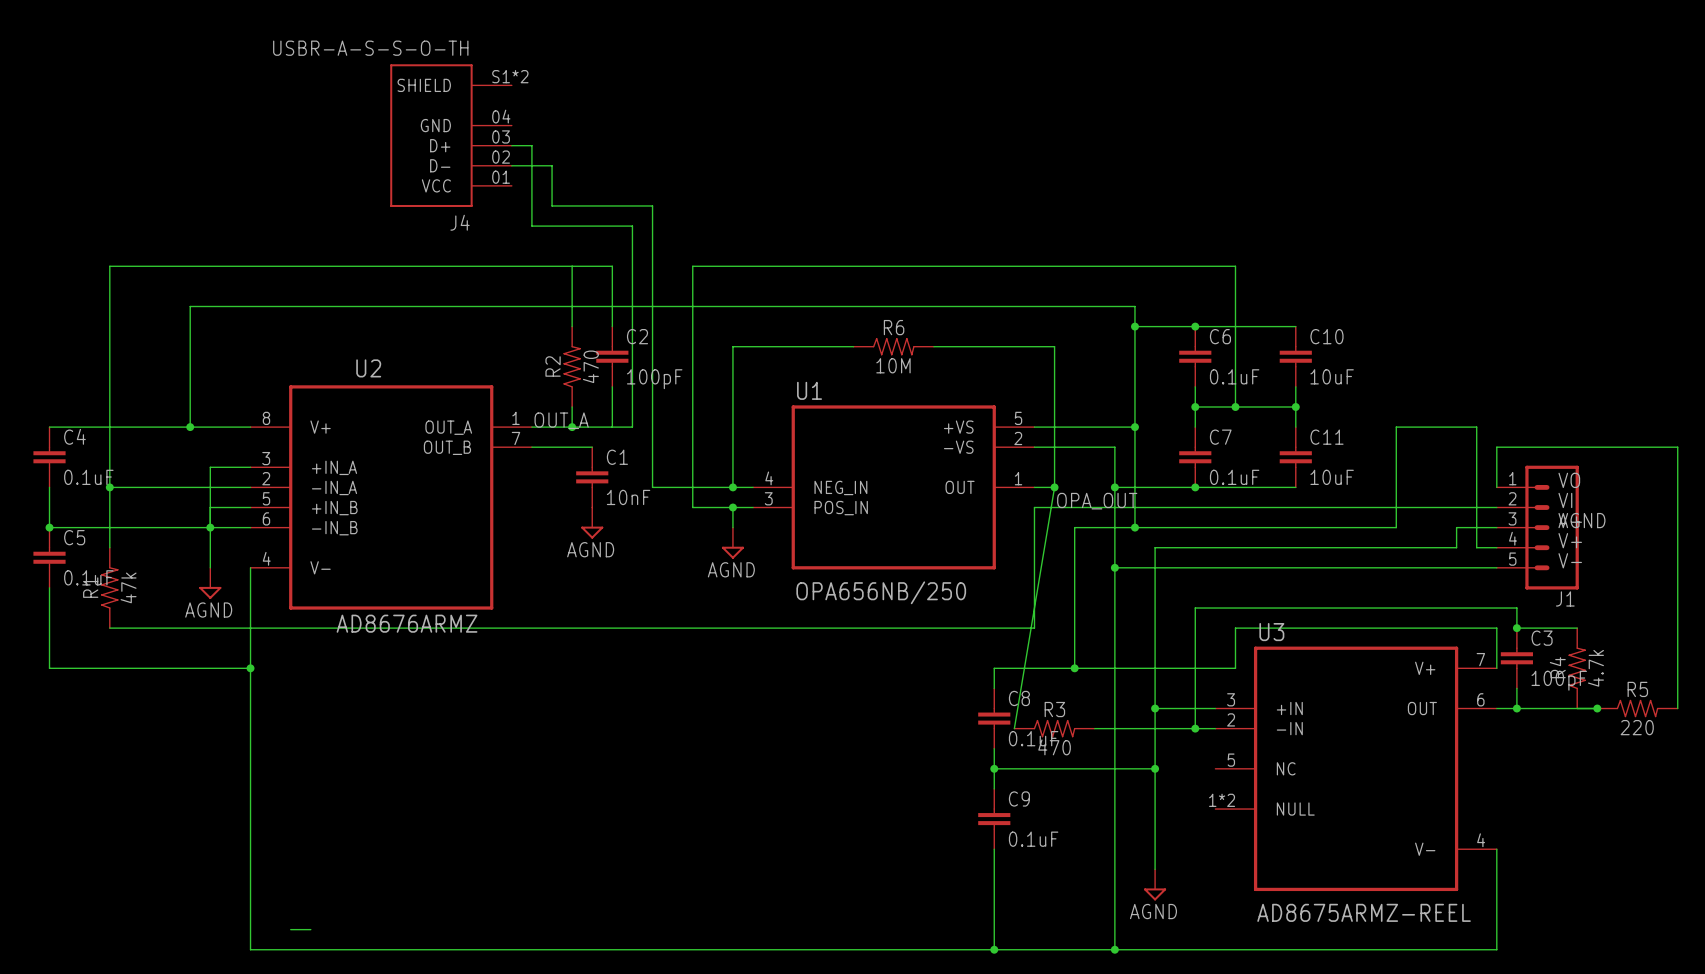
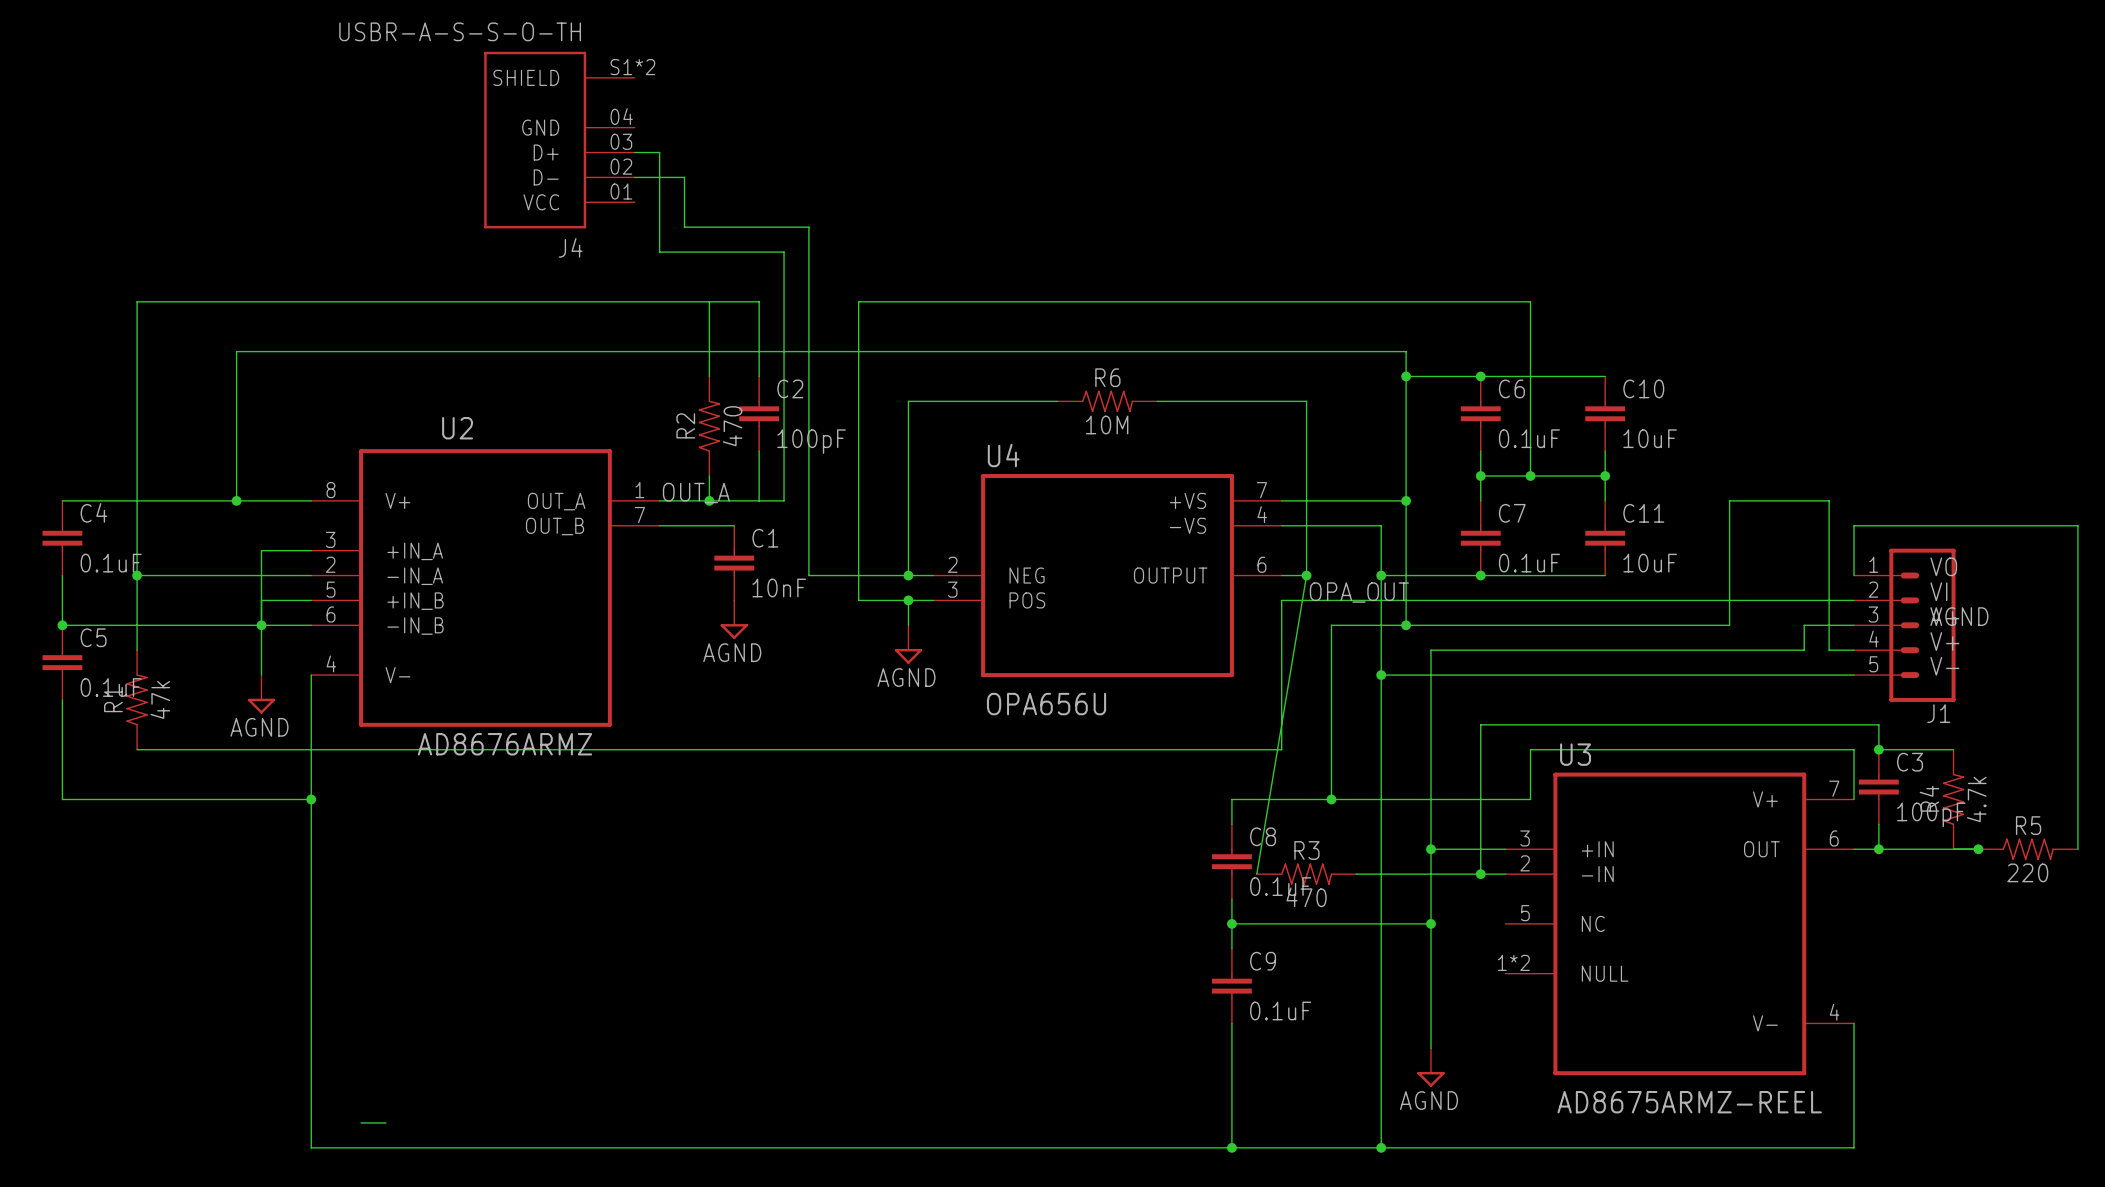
U1 name: U1 (809, 390) -> U4 (1003, 455)
U1 pin number: 5 (1018, 418) -> 7 (1261, 490)
U1 pin number: 2 (1018, 438) -> 4 (1262, 514)
U1 pin number: 4 (769, 478) -> 2 (952, 564)
U1 pin number: 1 (1018, 478) -> 6 (1261, 564)
U1 pin name: NEG_IN (840, 487) -> NEG (1027, 575)
U1 pin name: OUT (960, 487) -> OUTPUT (1170, 575)
U1 pin name: POS_IN (841, 508) -> POS (1027, 600)
U1 value: OPA656NB/250 (881, 592) -> OPA656U (1046, 704)

